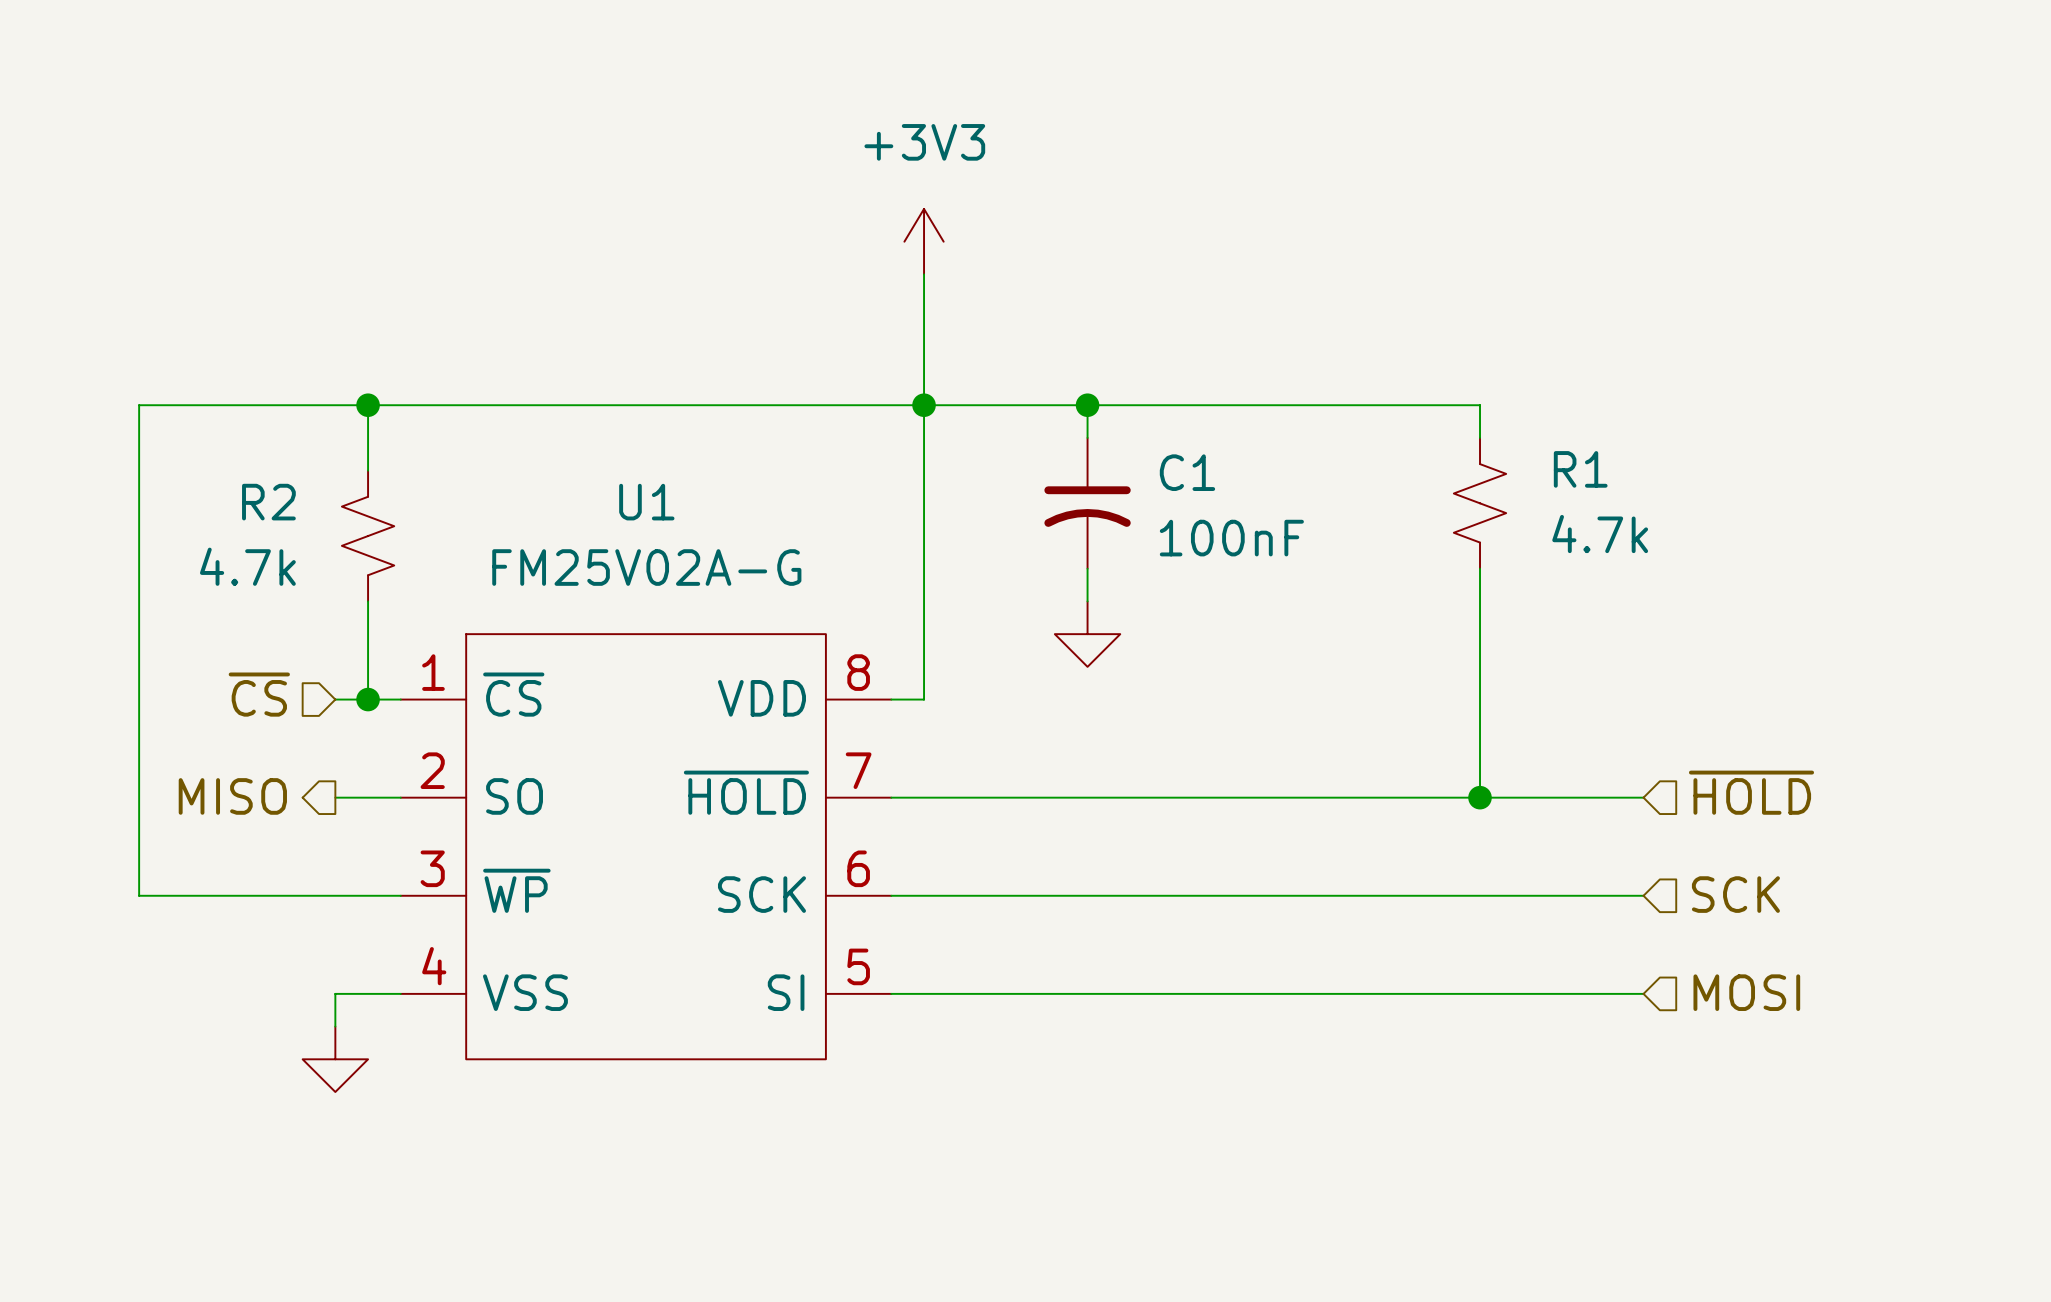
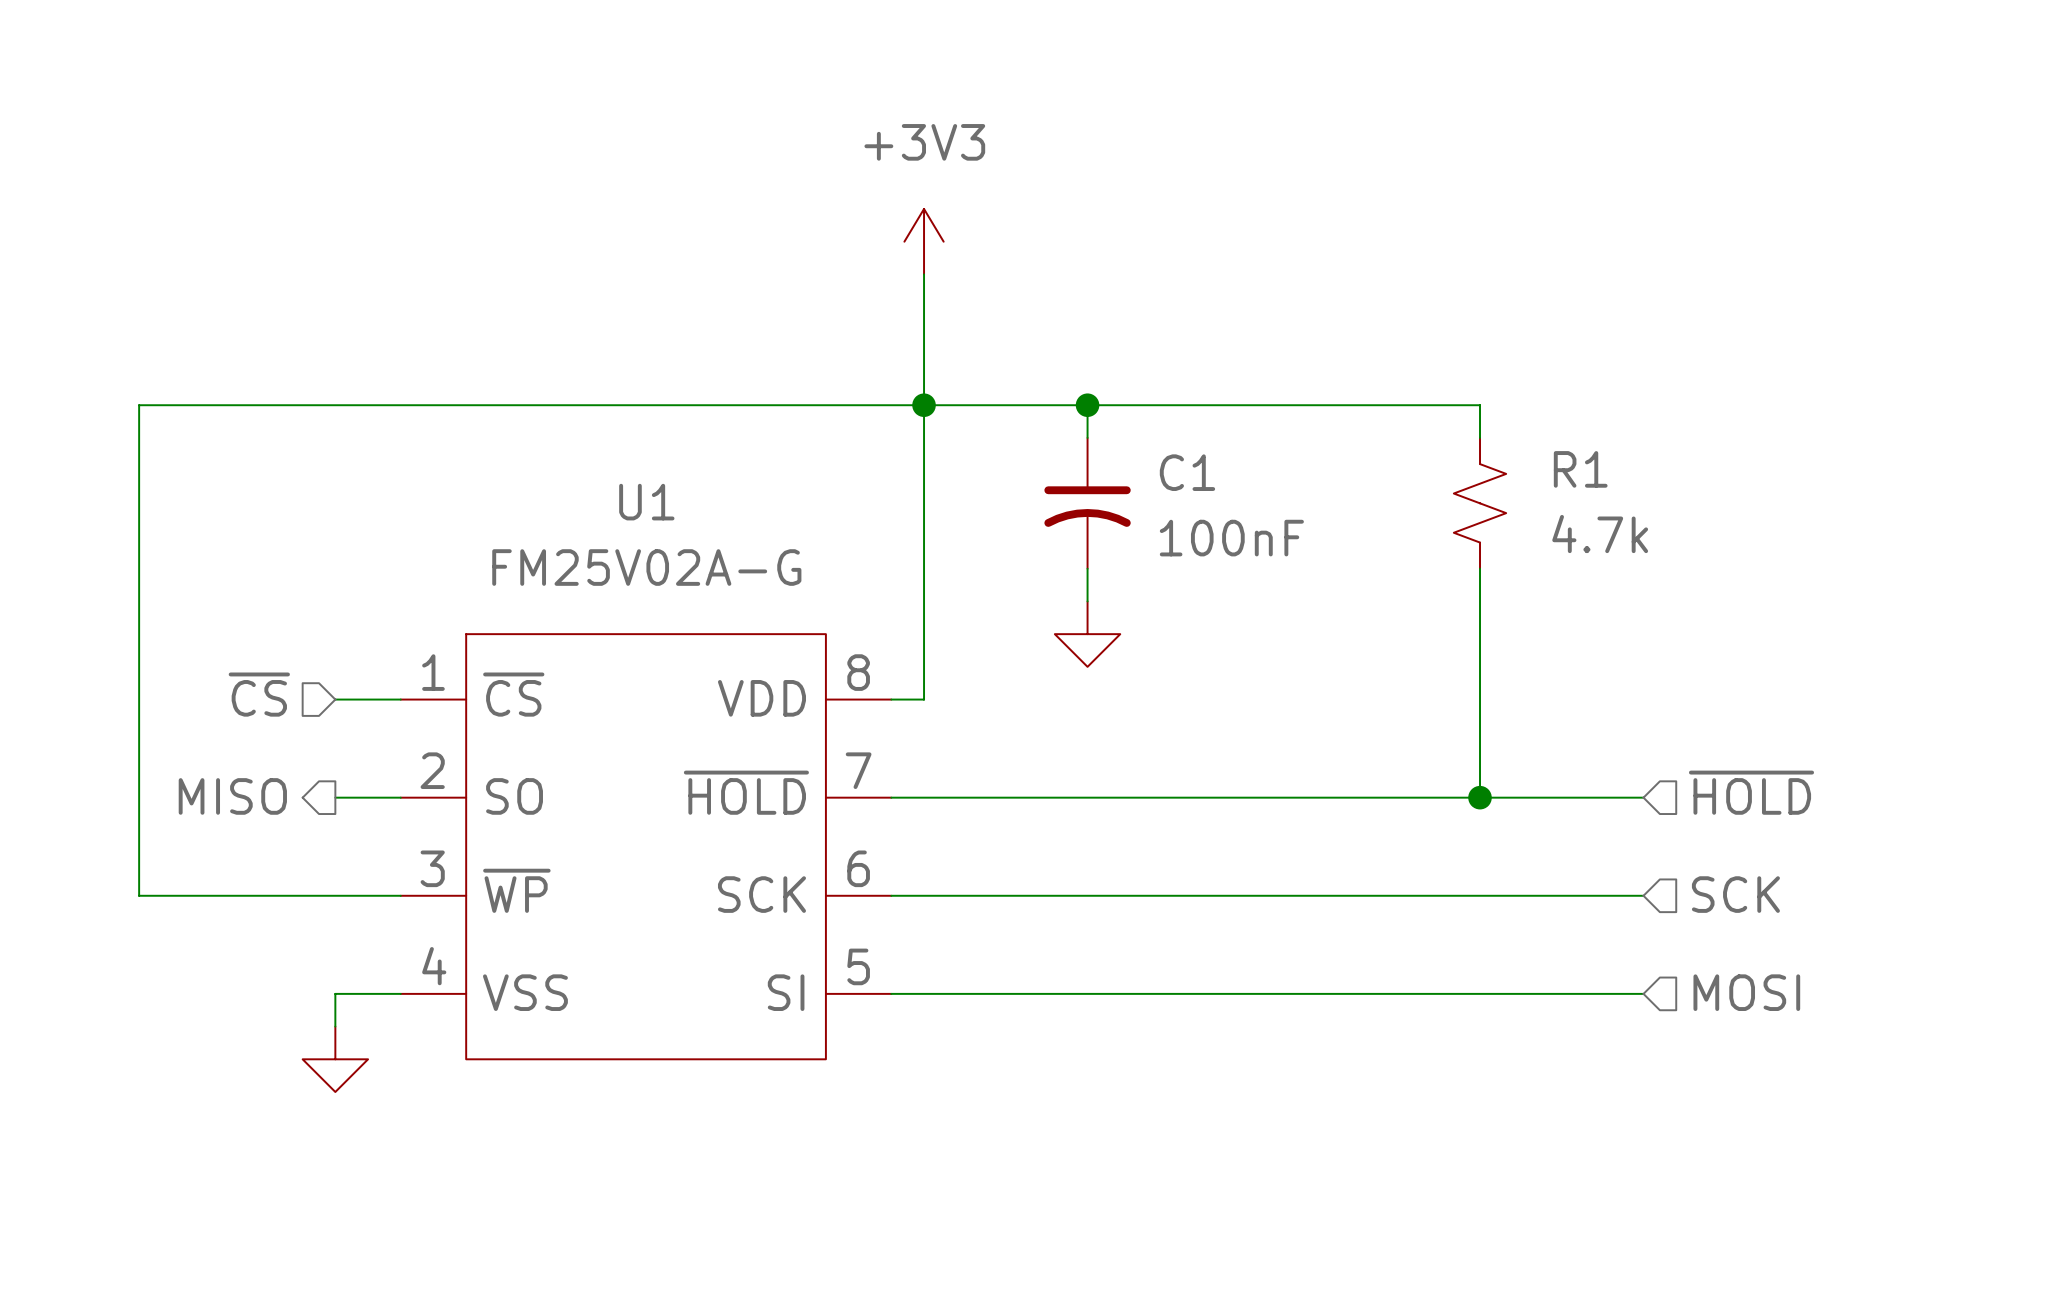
wire: (368, 405) (368, 470) -> none
junction: (368, 405) -> none
R2: 4.7k (368, 536) -> none
wire: (368, 601) (368, 699) -> none
junction: (368, 699) -> none

